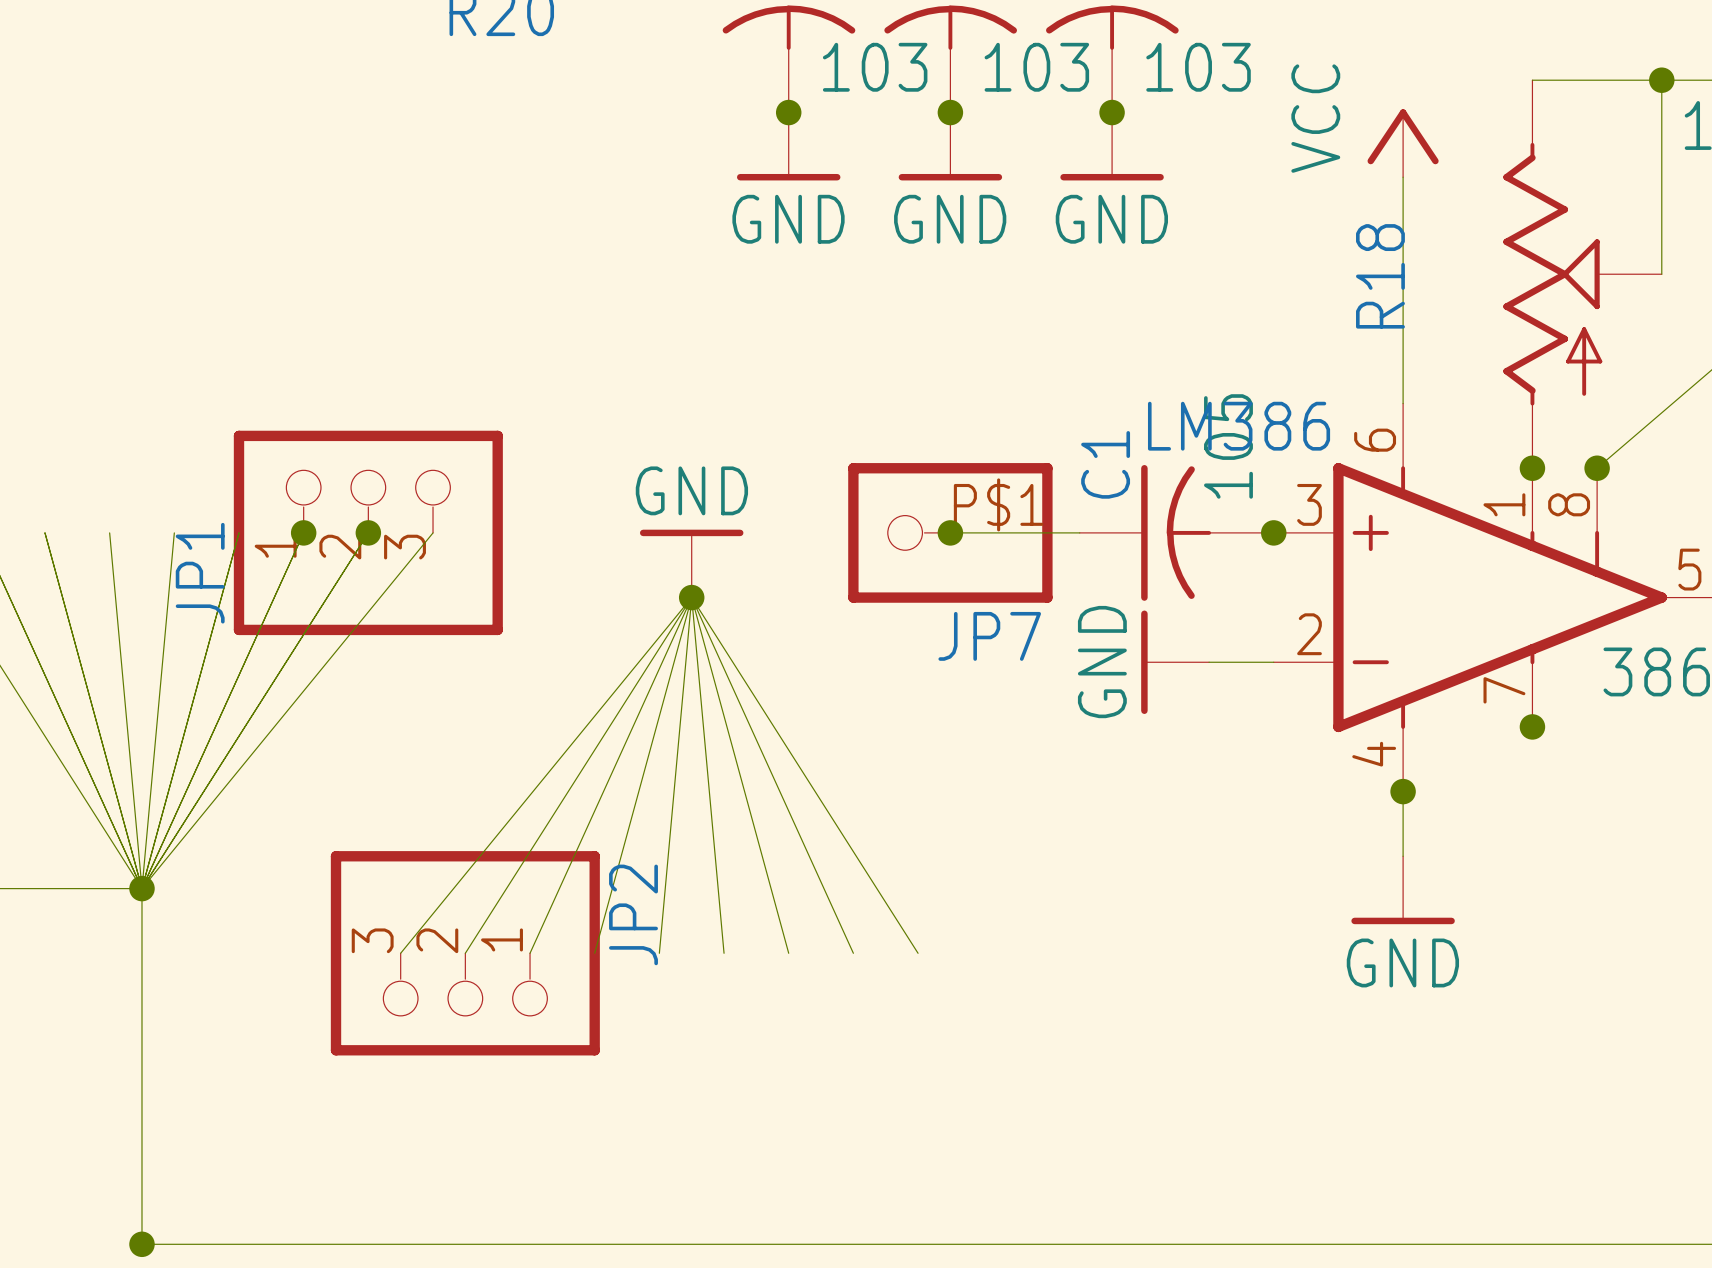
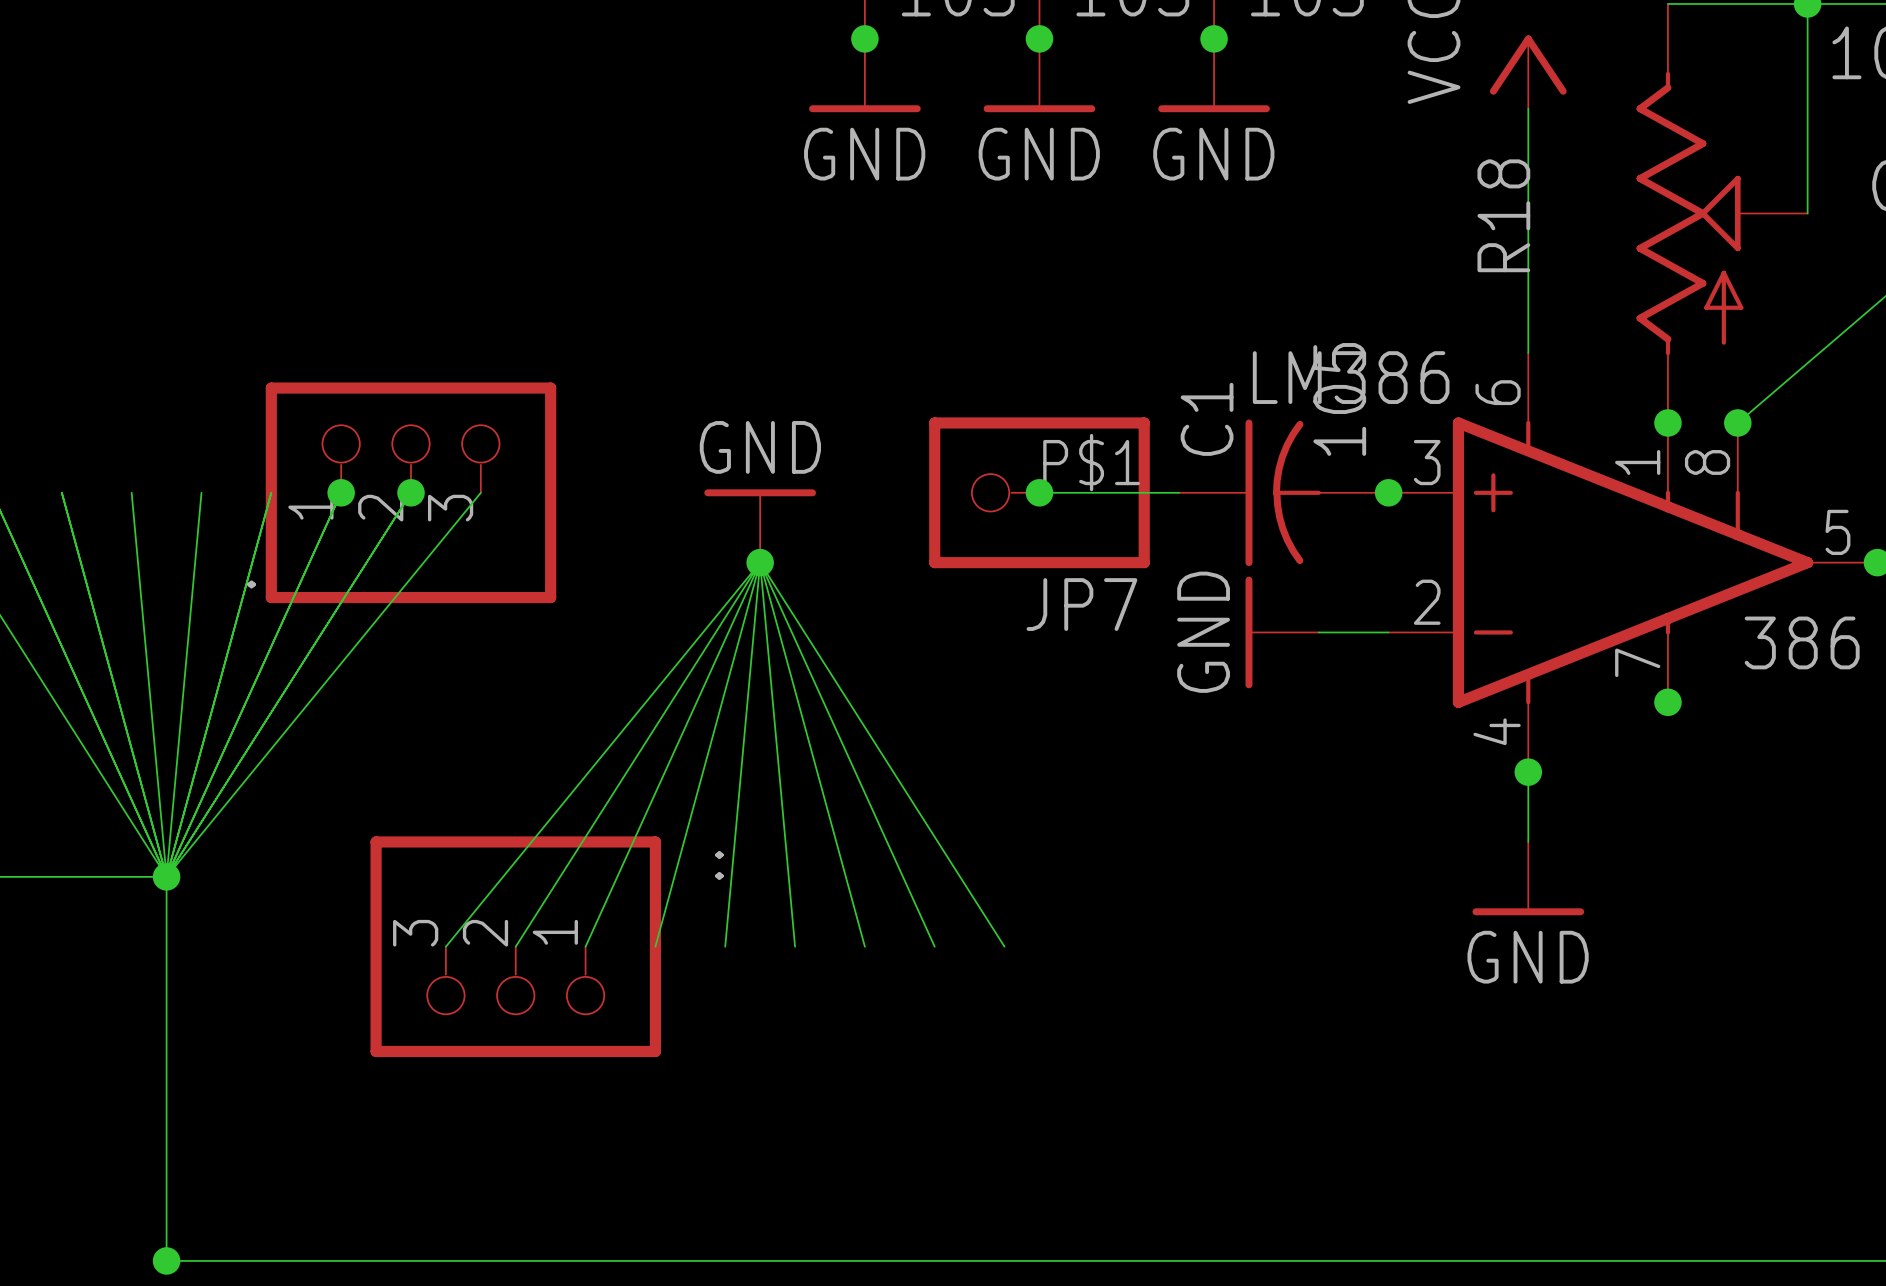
JP1 name: JP1 (200, 573) -> . (251, 584)
JP2 name: JP2 (633, 914) -> .. (719, 865)

